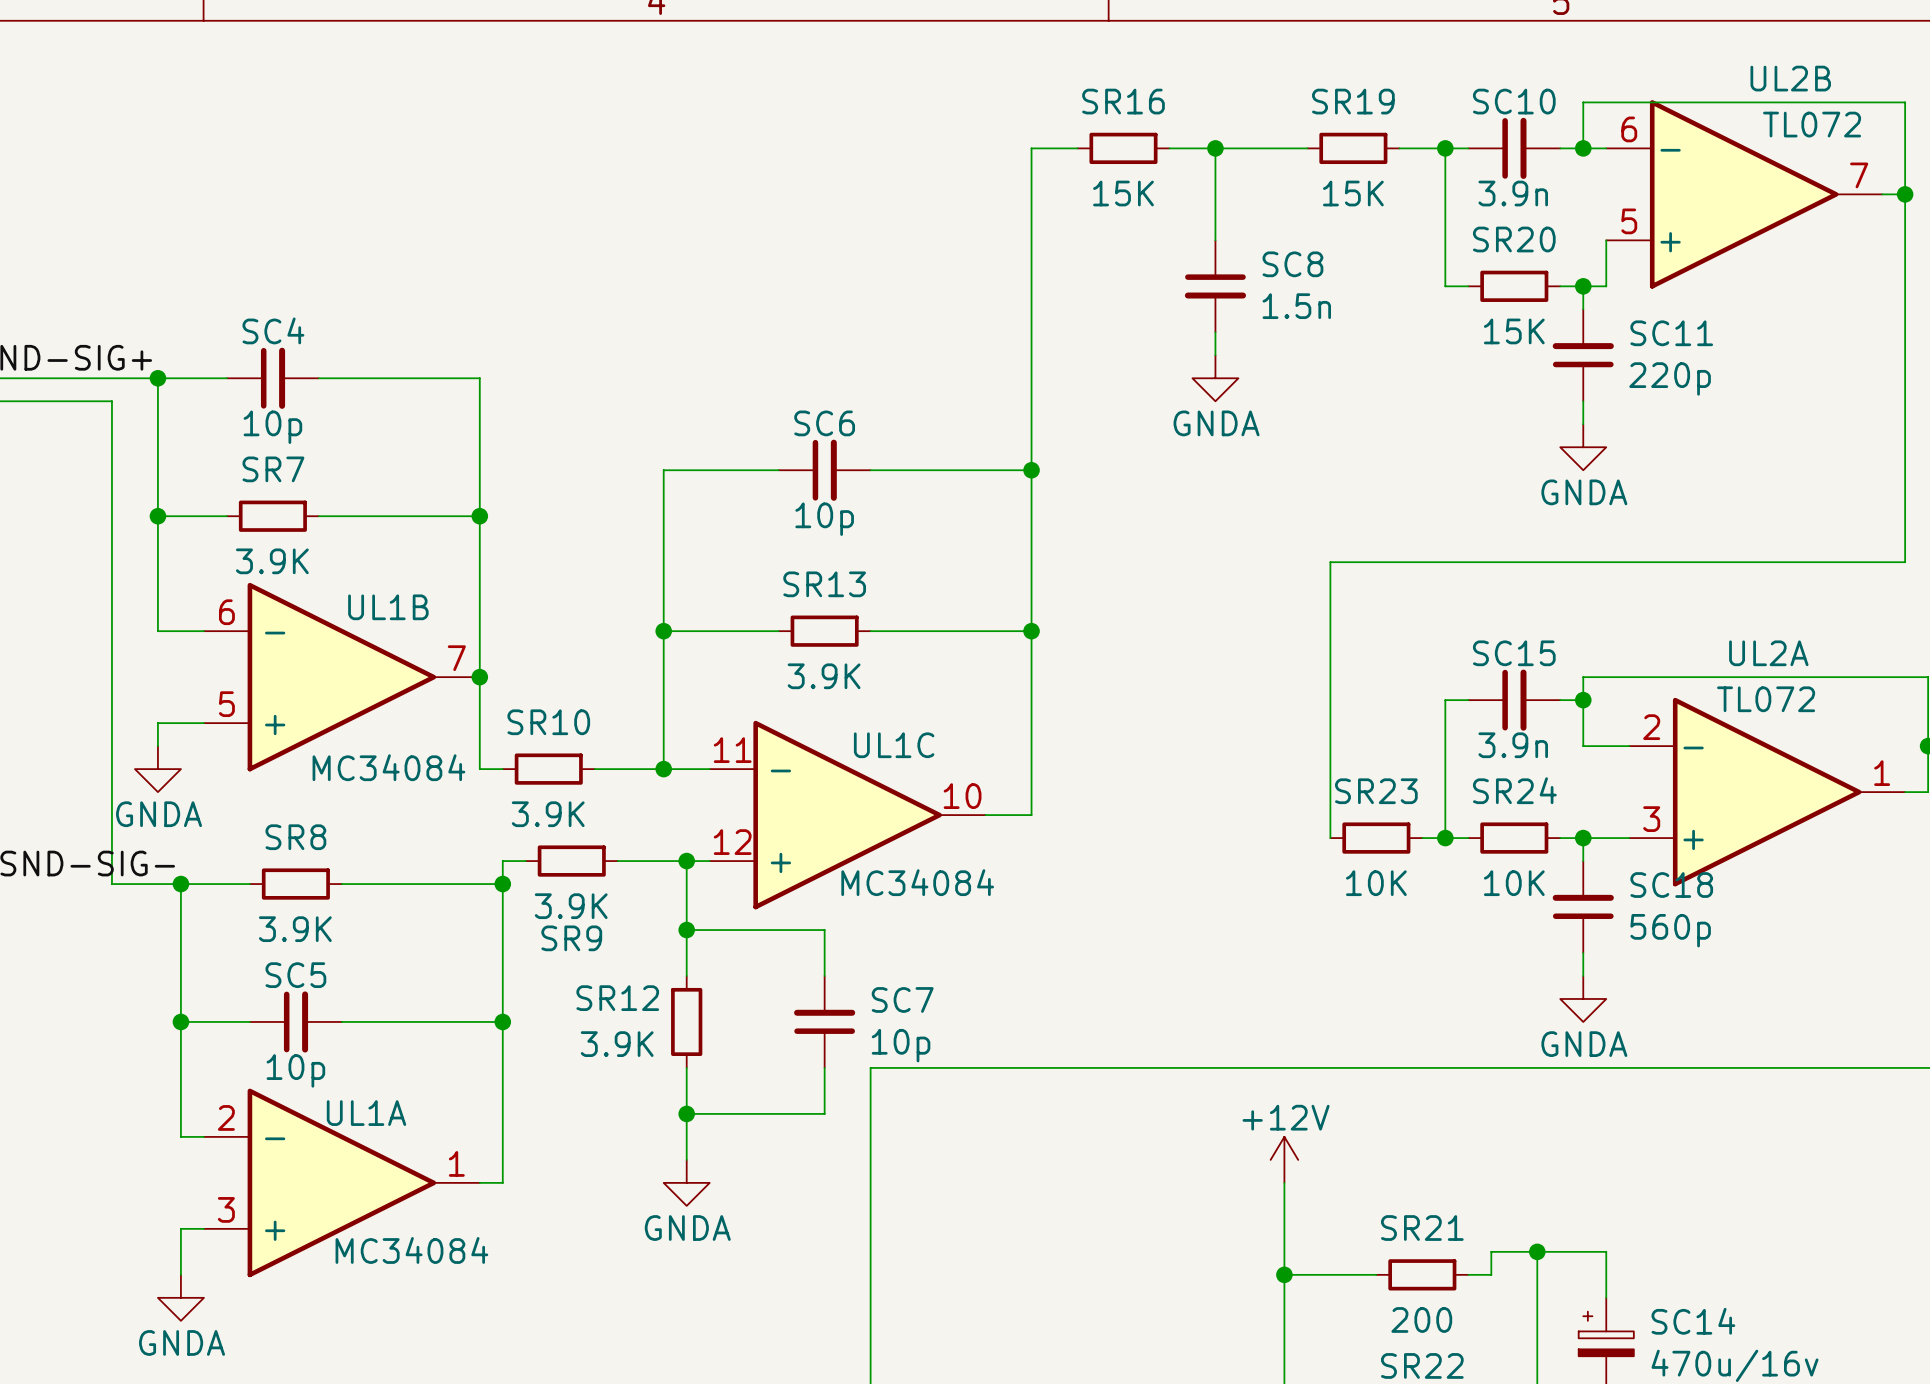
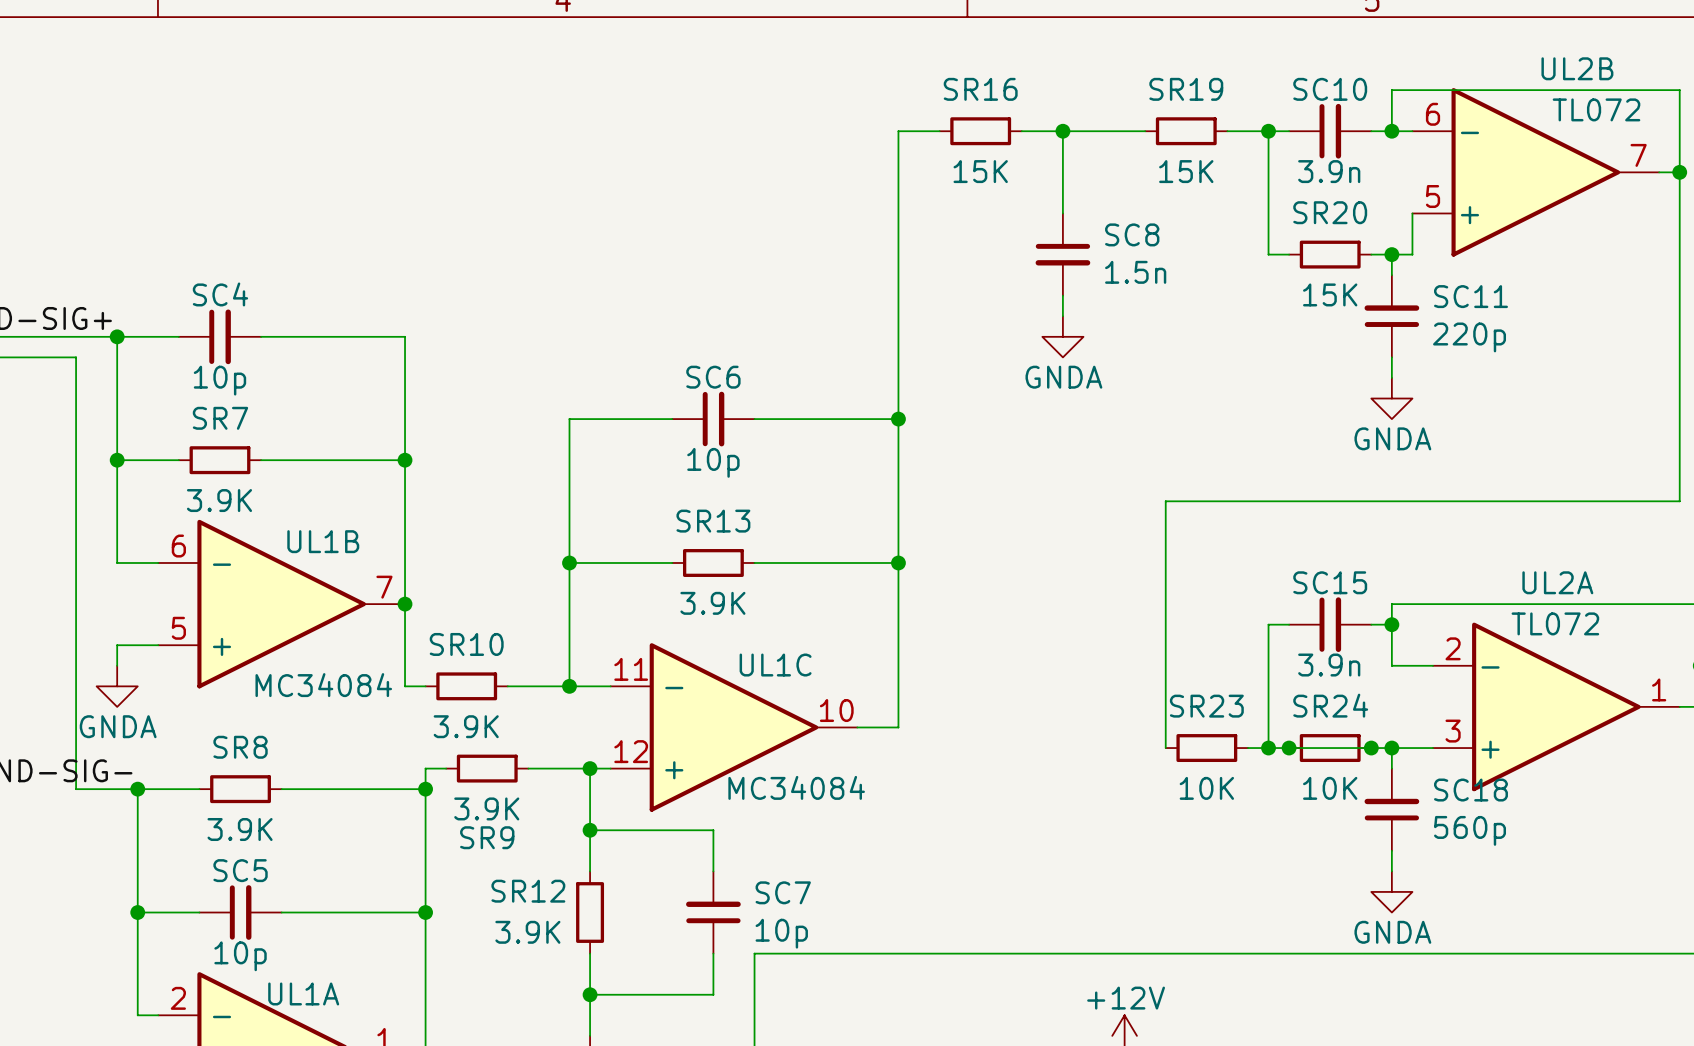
wire: none -> (1289, 748) (1371, 748)
junction: none -> (1289, 748)
junction: none -> (1371, 748)

